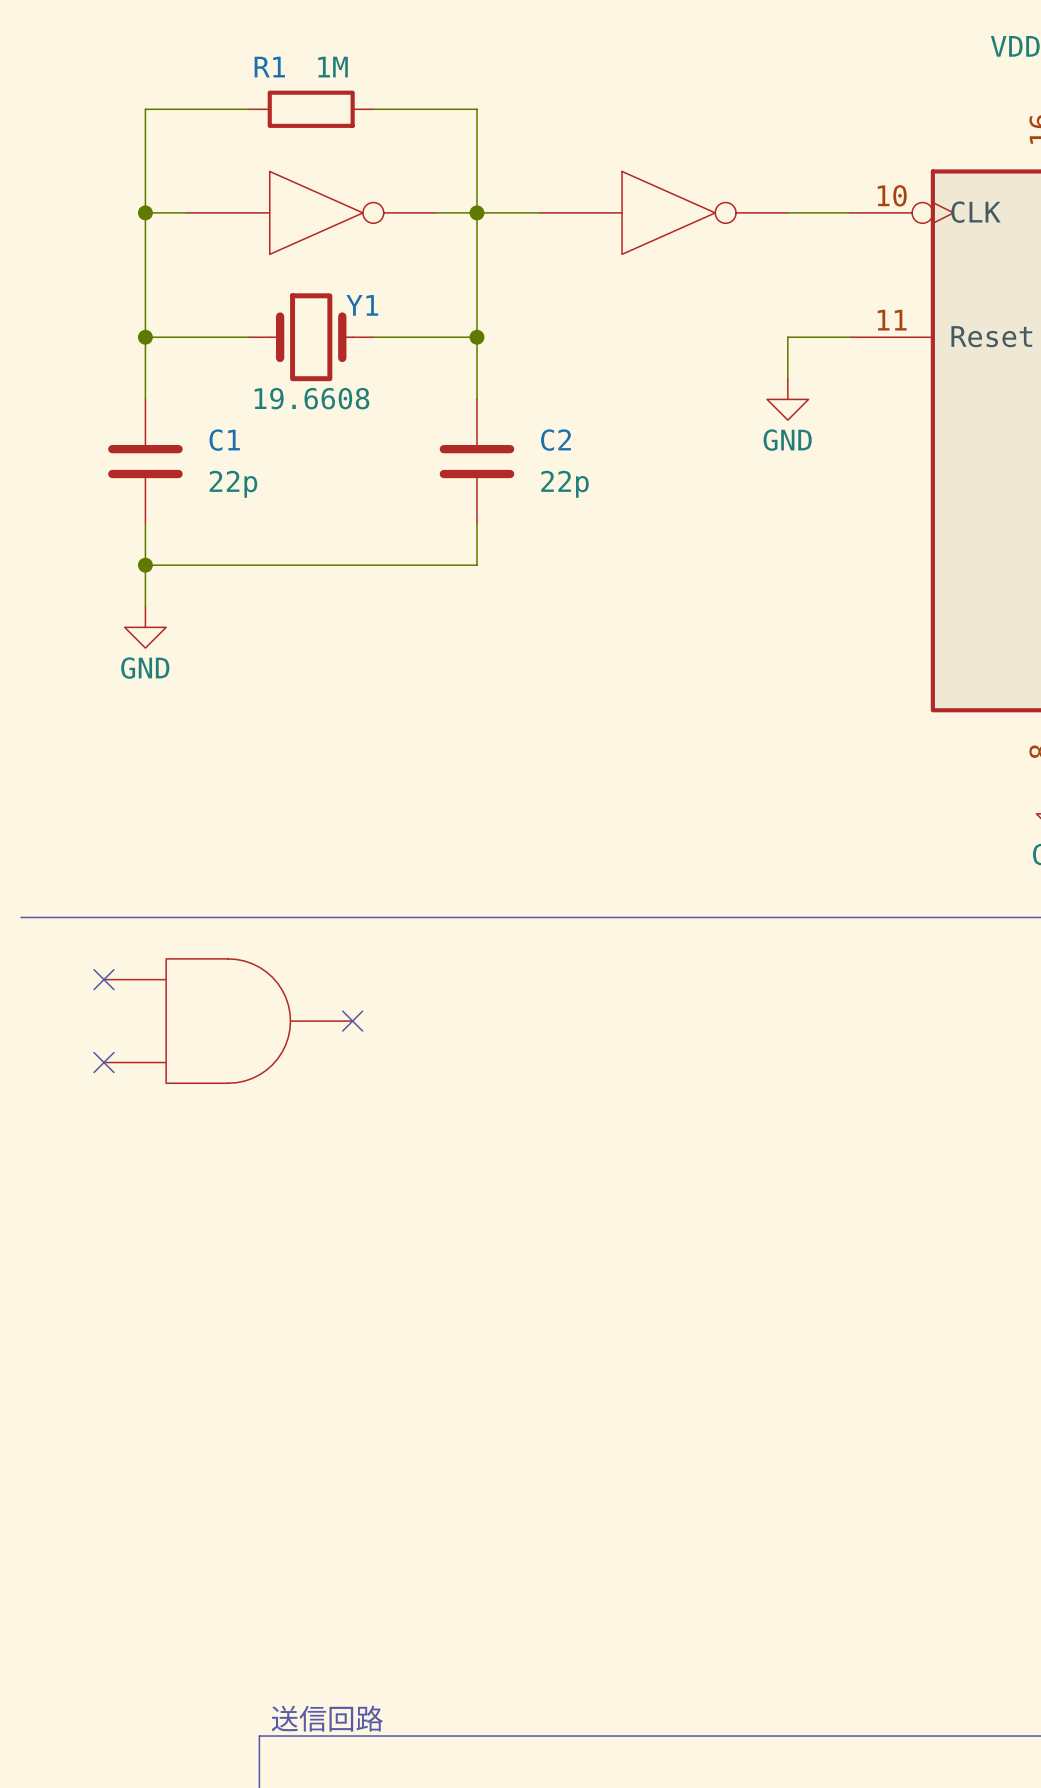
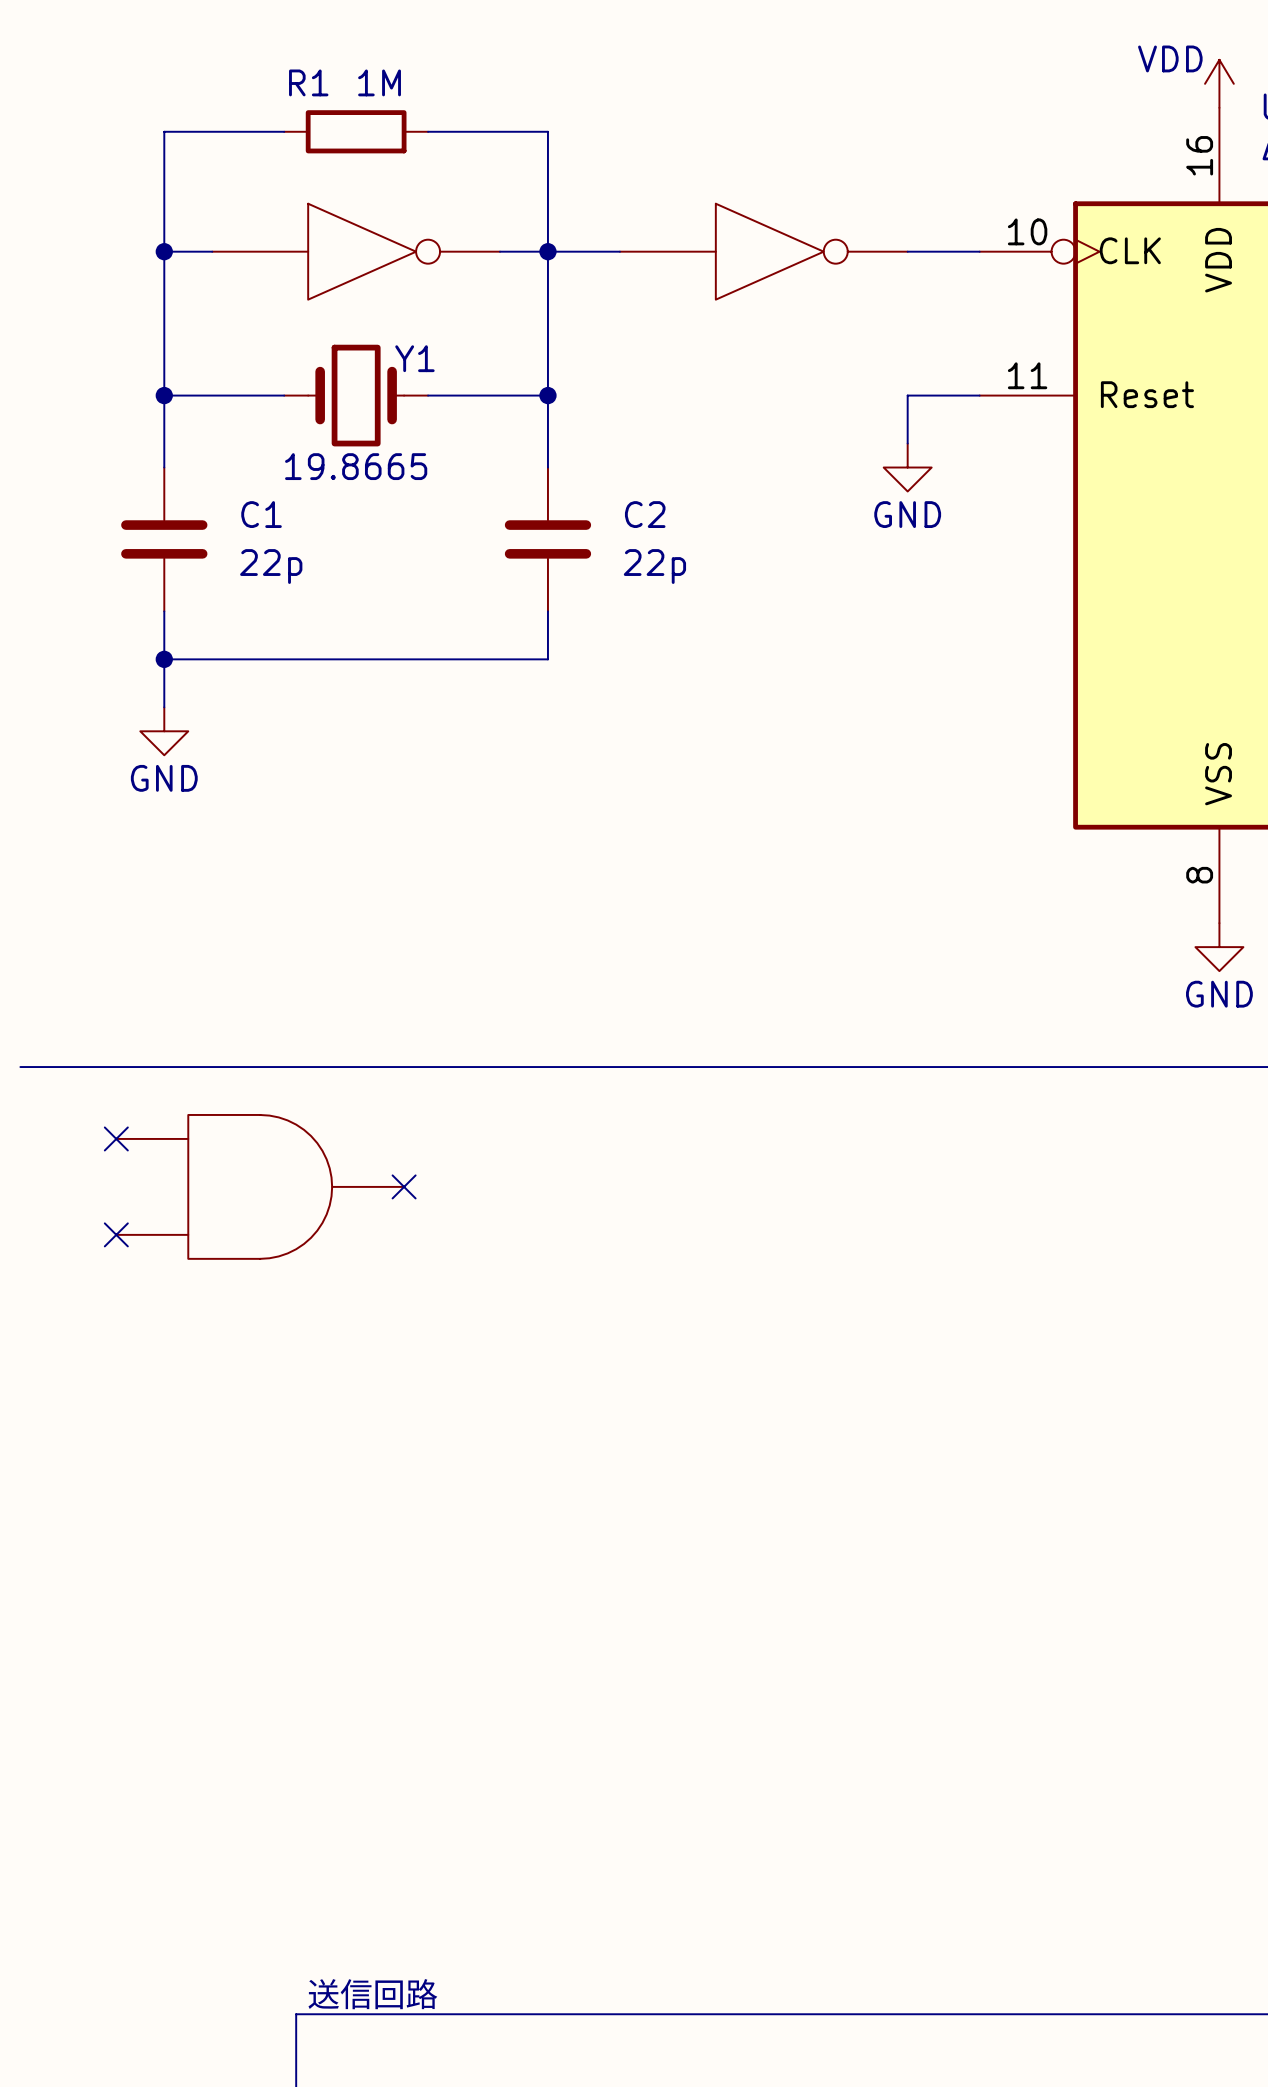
Y1 value: 19.6608 (312, 398) -> 19.8665 (356, 466)

